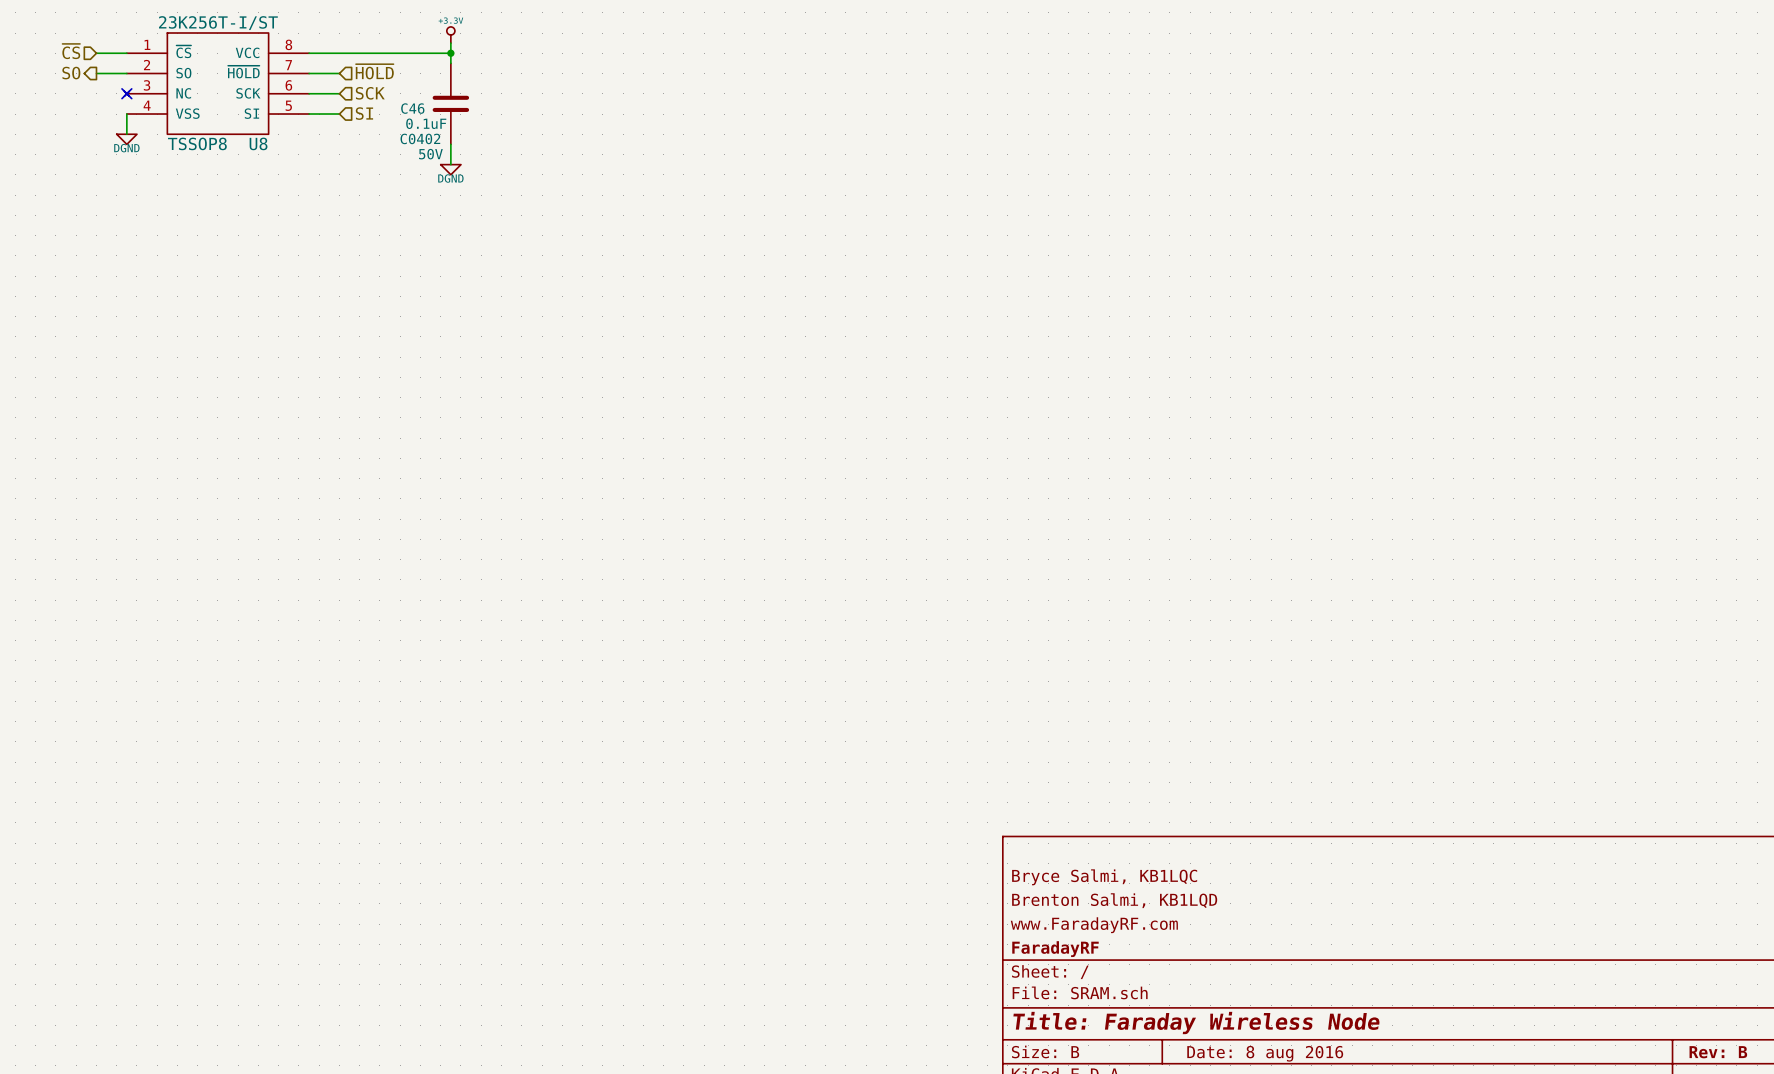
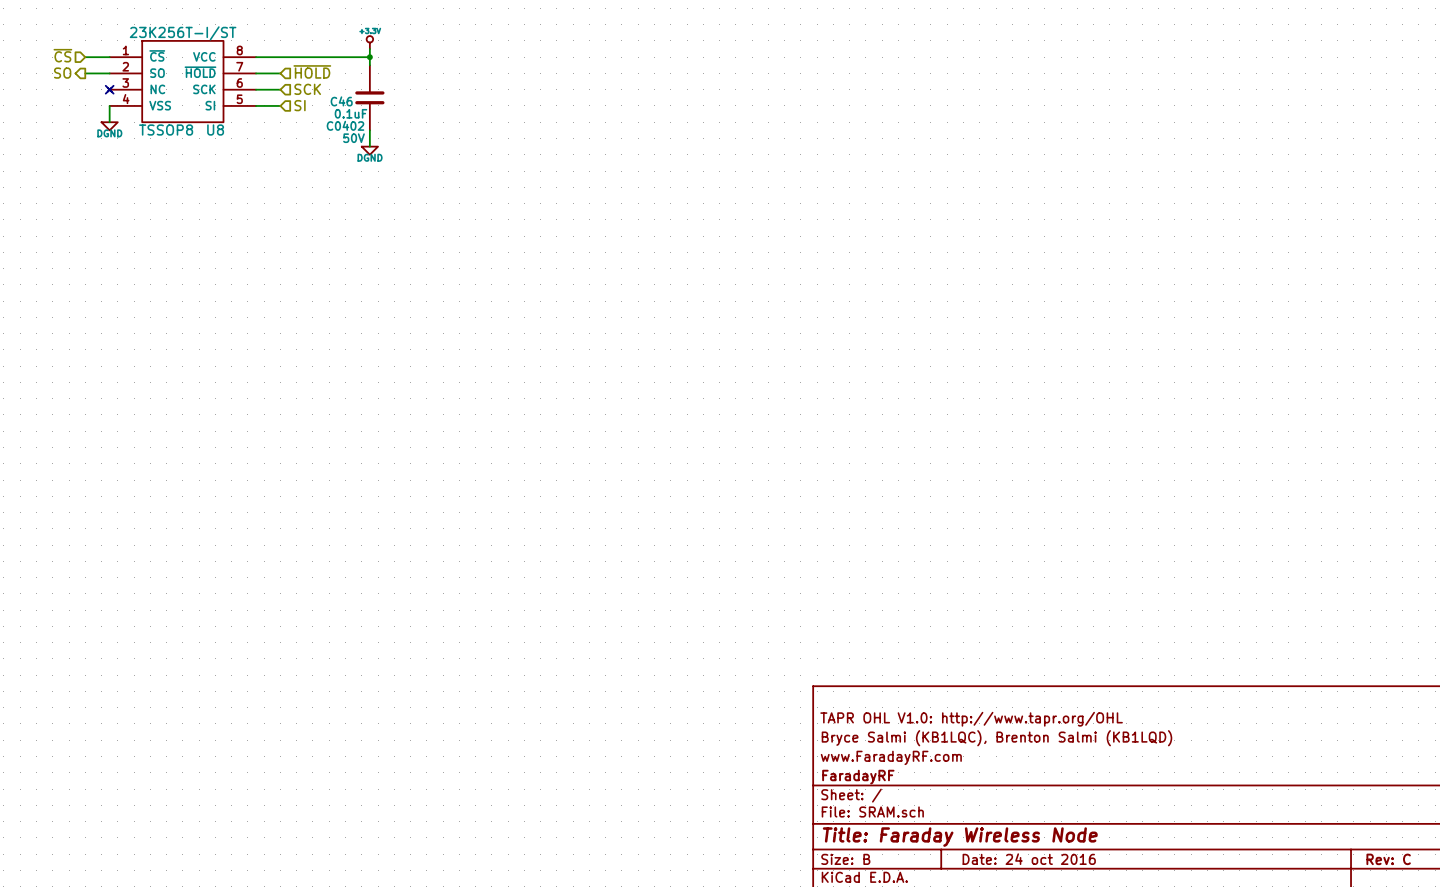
title block: Bryce Salmi, KB1LQC (1104, 877) -> TAPR OHL V1.0: http://www.tapr.org/OHL (971, 719)
title block: Brenton Salmi, KB1LQD (1114, 900) -> Bryce Salmi (KB1LQC), Brenton Salmi (KB1LQD) (996, 738)
title block: Rev: B (1718, 1052) -> Rev: C (1388, 859)
title block: Date: 8 aug 2016 (1265, 1053) -> Date: 24 oct 2016 (1029, 859)

